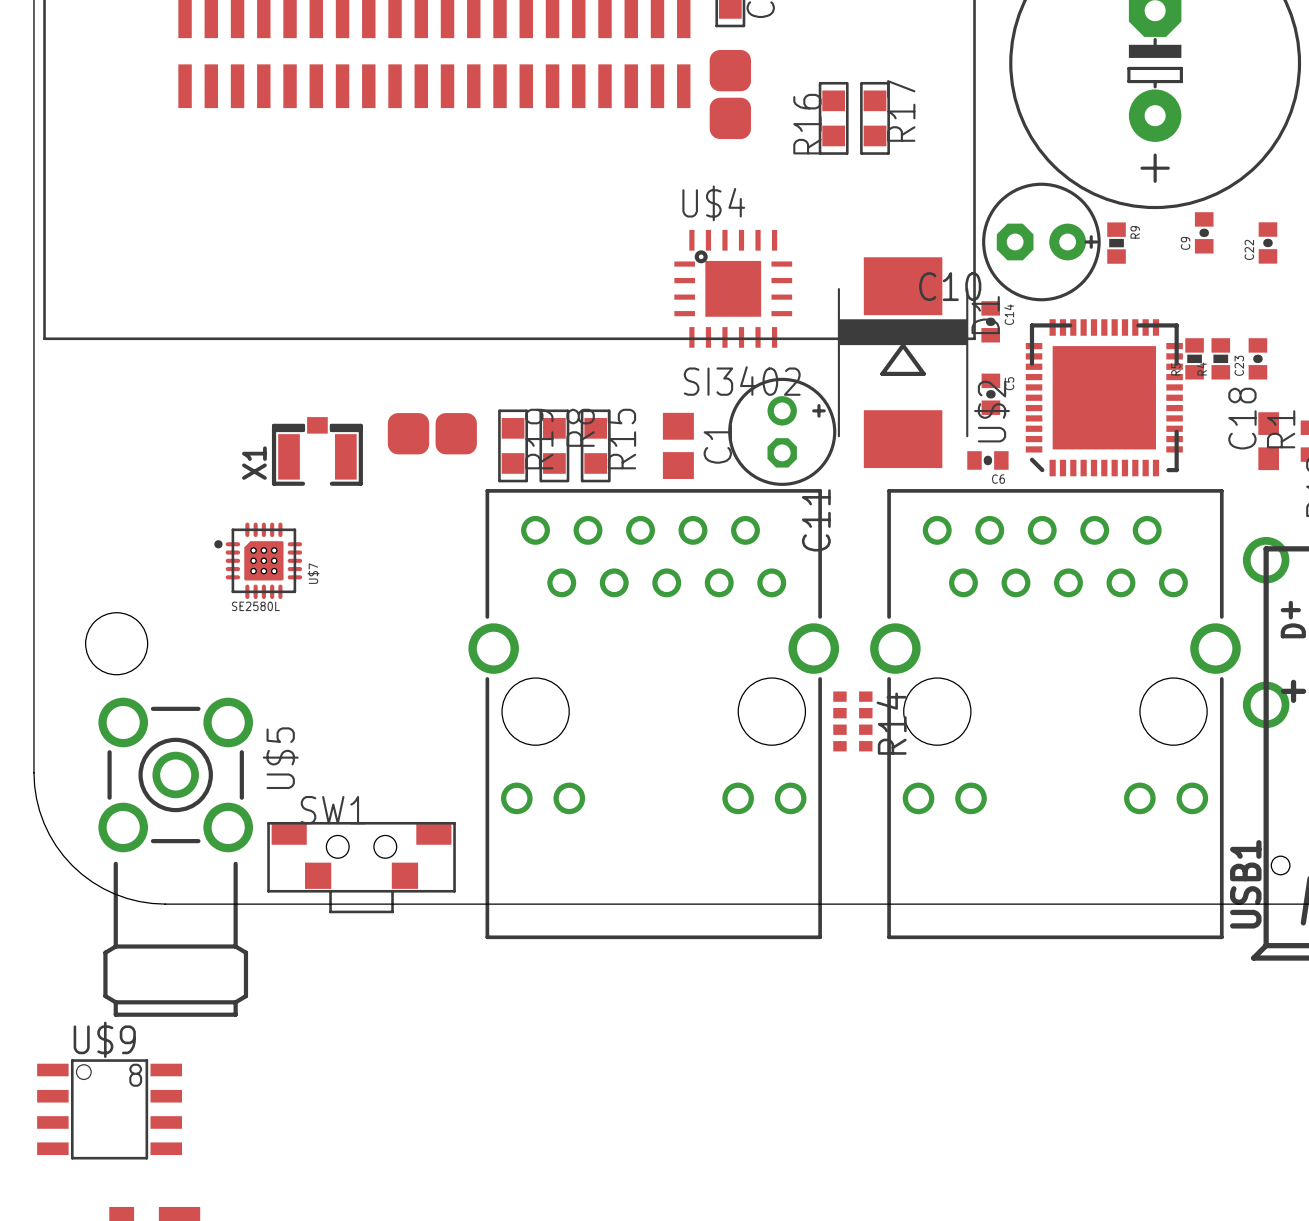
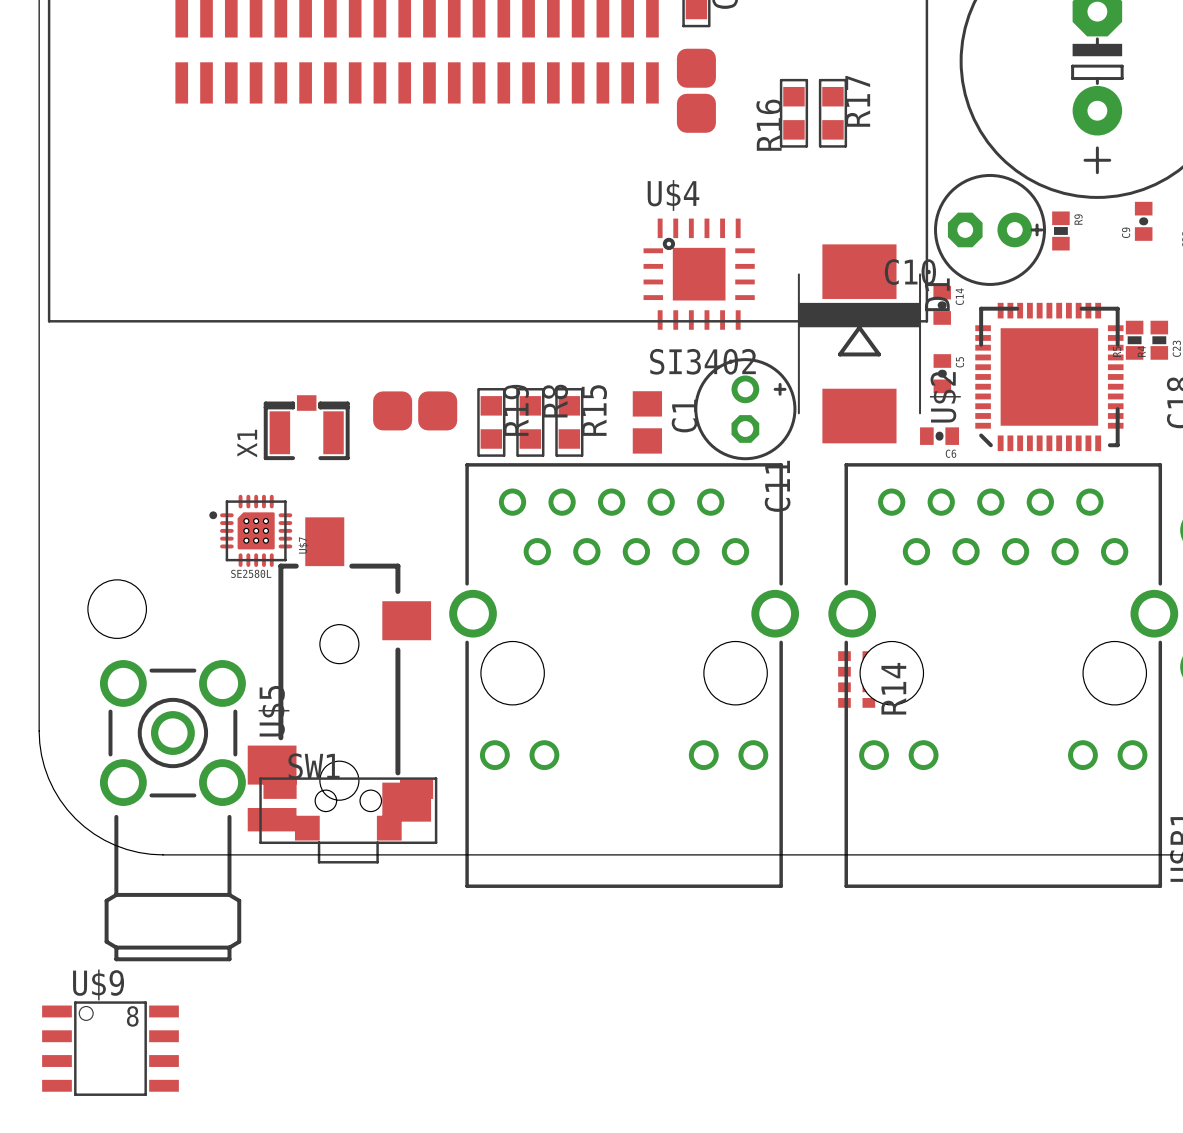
part: none -> (339, 674)
R14 position: (852, 721) -> (856, 679)

